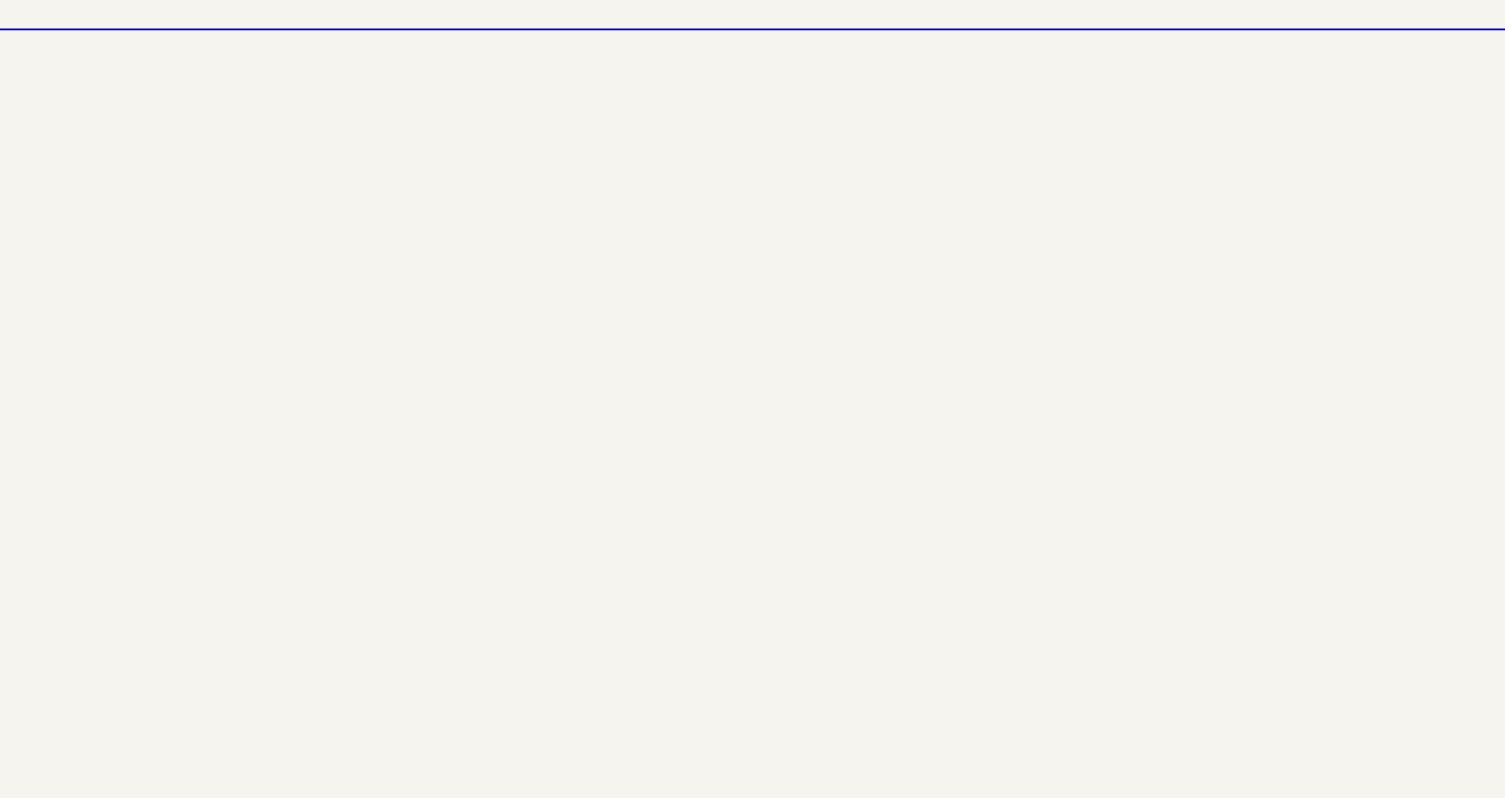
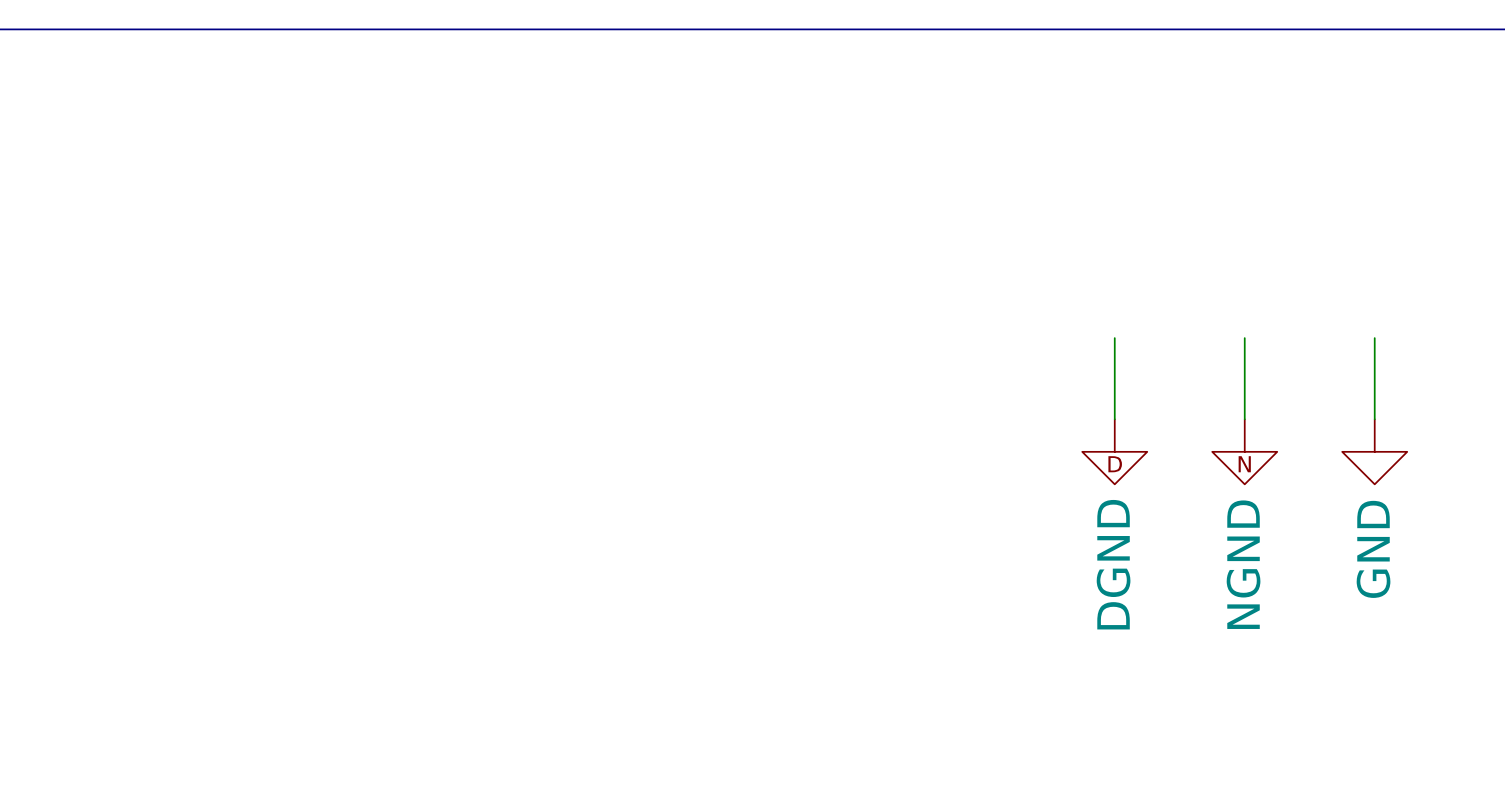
wire: none -> (1114, 338) (1114, 419)
wire: none -> (1244, 338) (1244, 419)
wire: none -> (1374, 338) (1374, 419)
power symbol: none -> DGND (1114, 451)
power symbol: none -> NGND (1244, 451)
power symbol: none -> GND (1374, 451)

